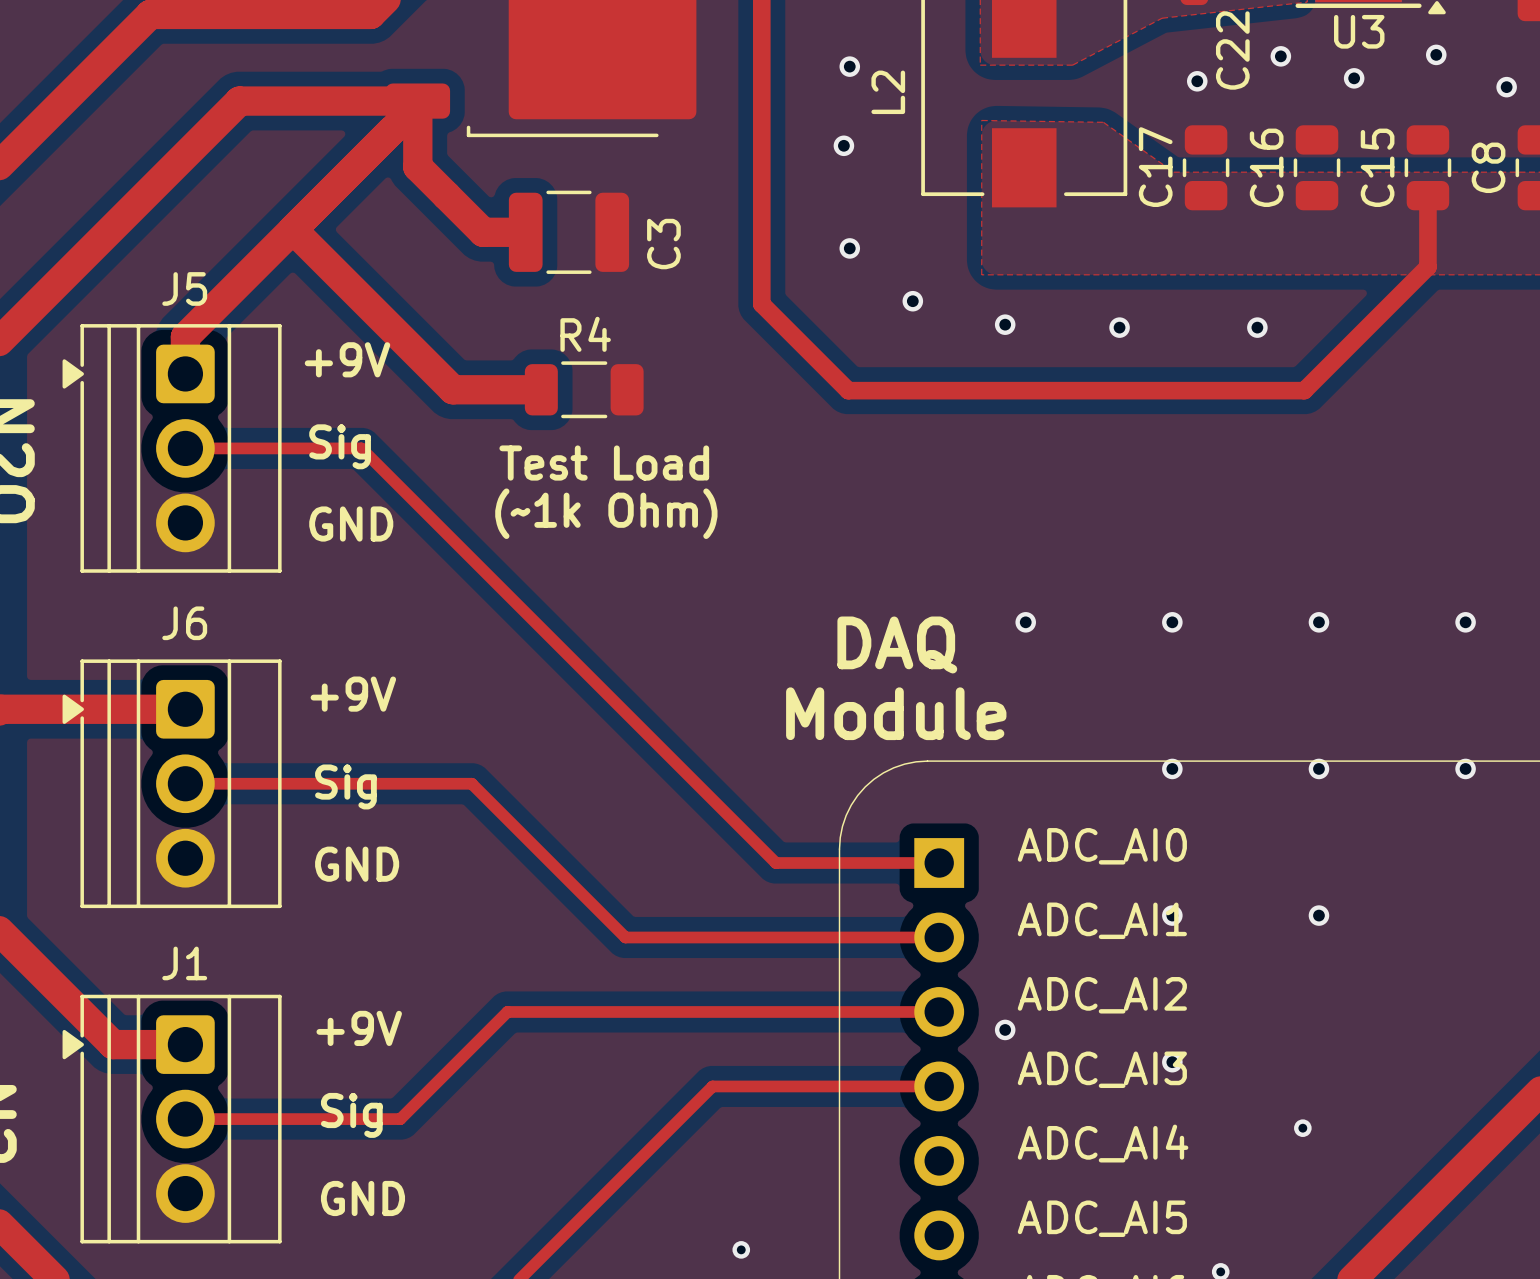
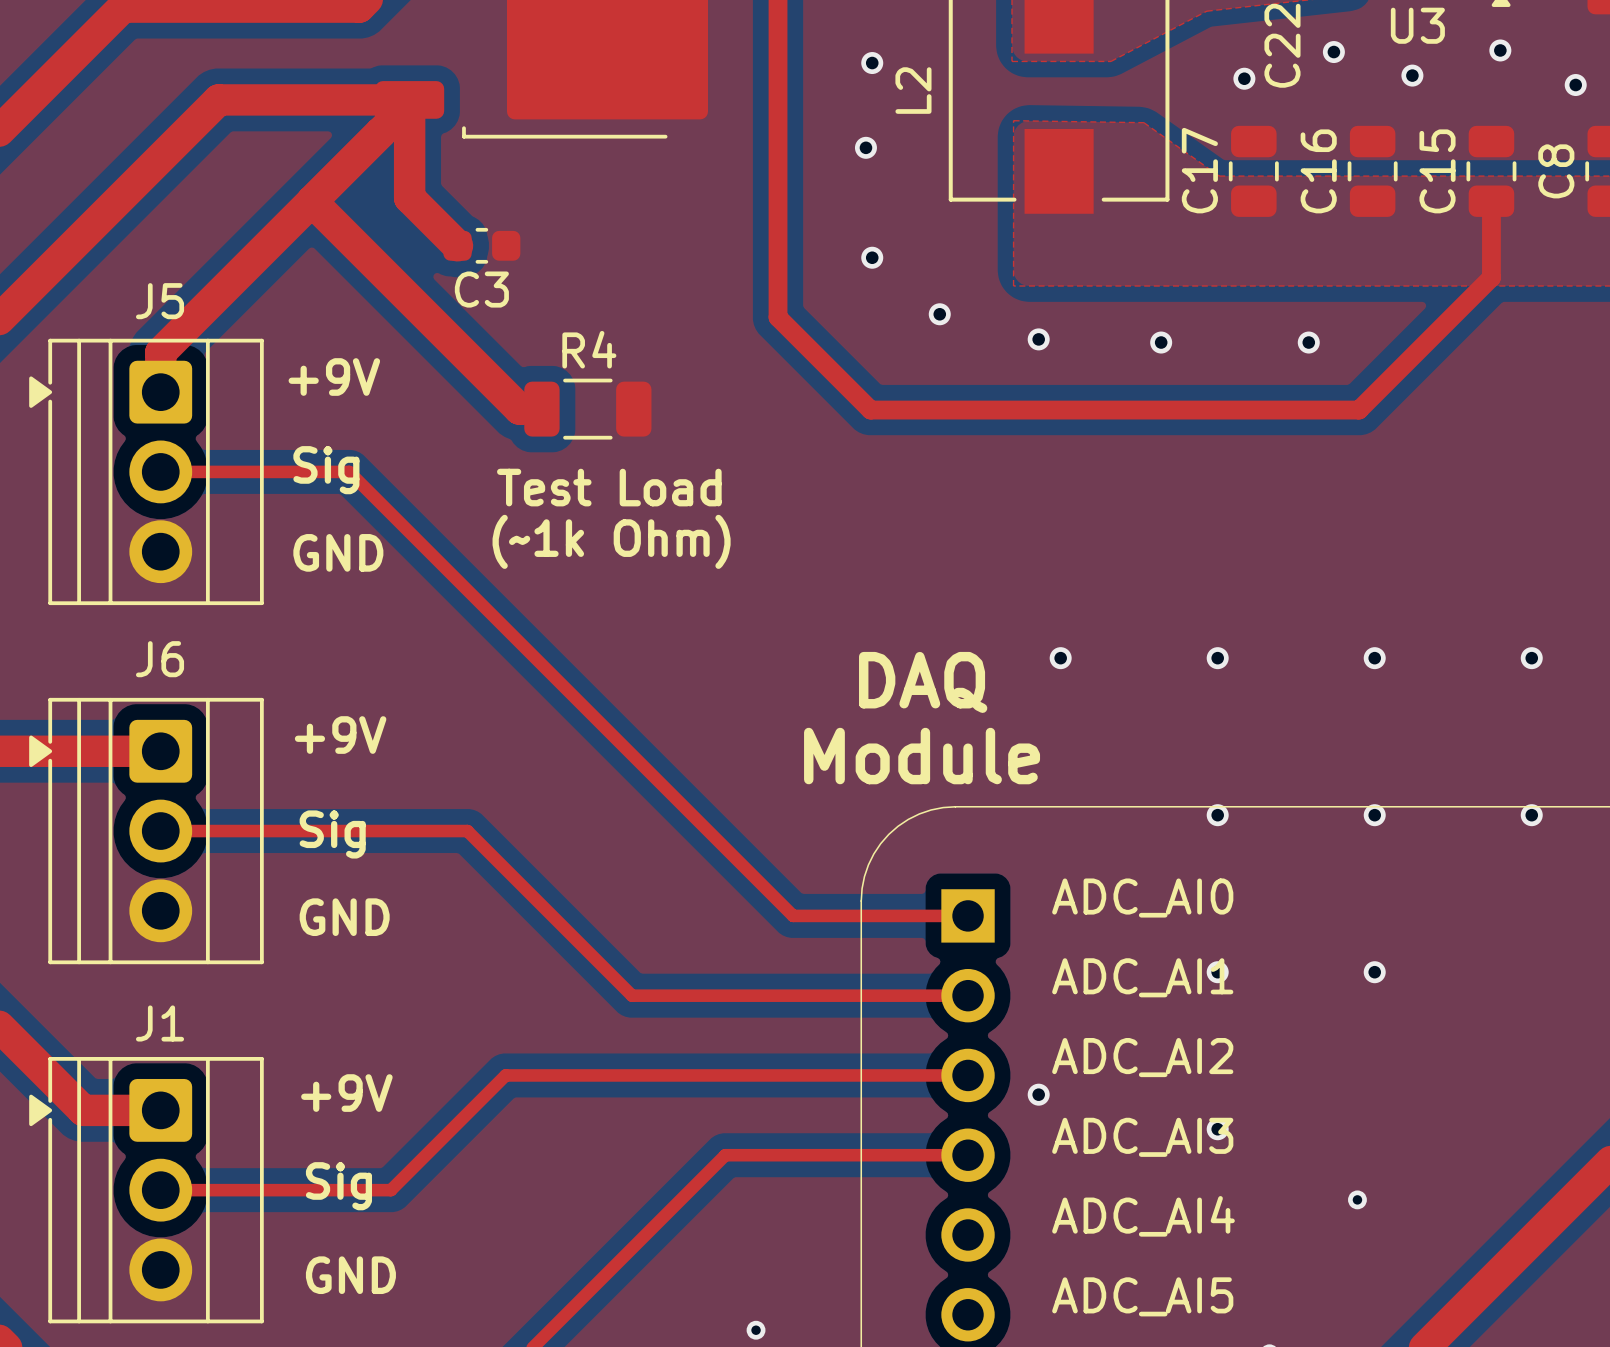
top track: (417, 166) (483, 232) (525, 232) -> (409, 170) (409, 197) (457, 245)
C3 footprint: [508, 190, 630, 274] -> [443, 227, 521, 264]
top track: (292, 229) (453, 389) (520, 389) -> (311, 201) (519, 409)
C3 name position: C3 (663, 244) -> C3 (481, 289)

